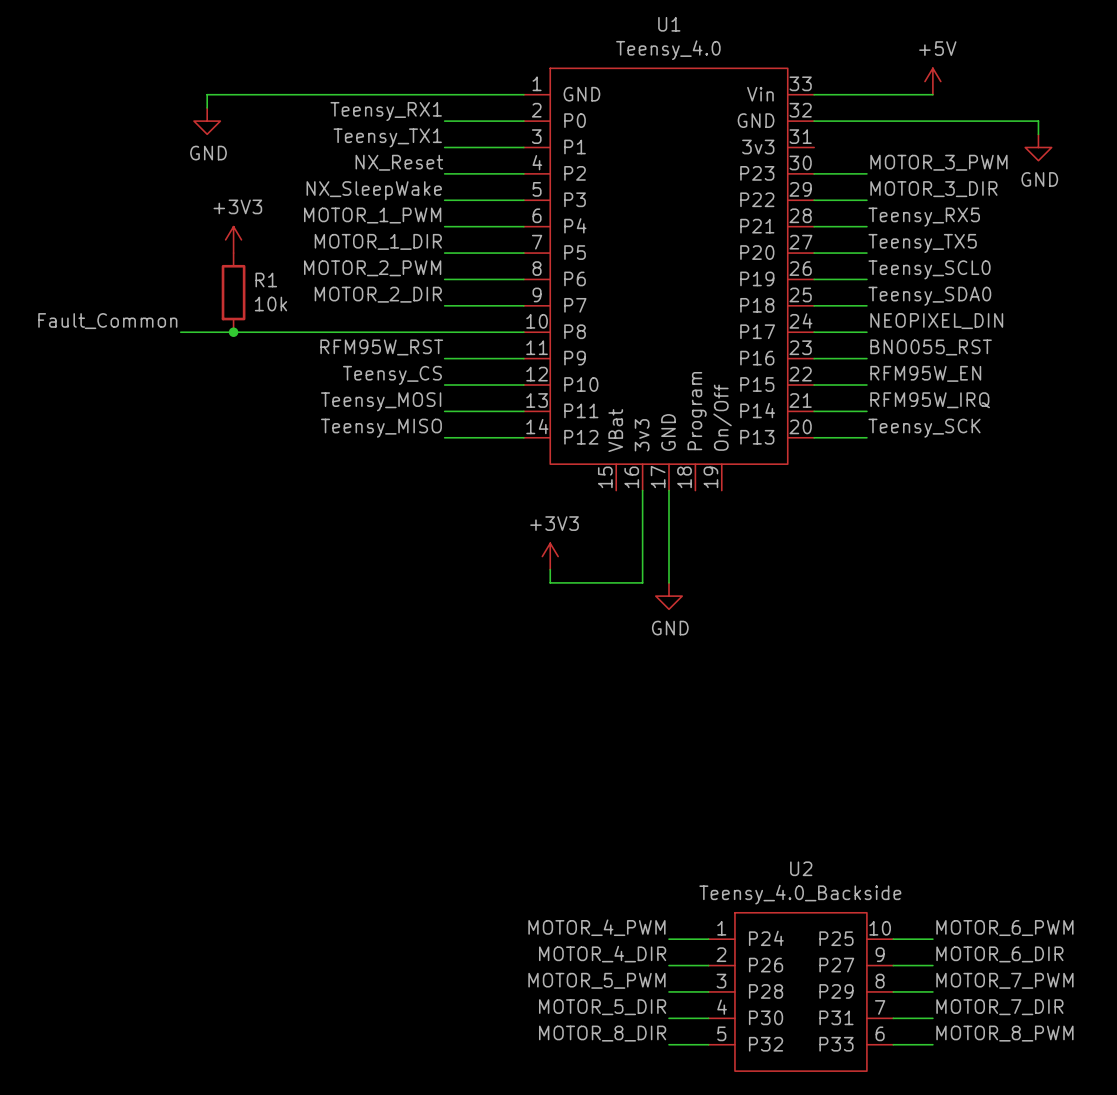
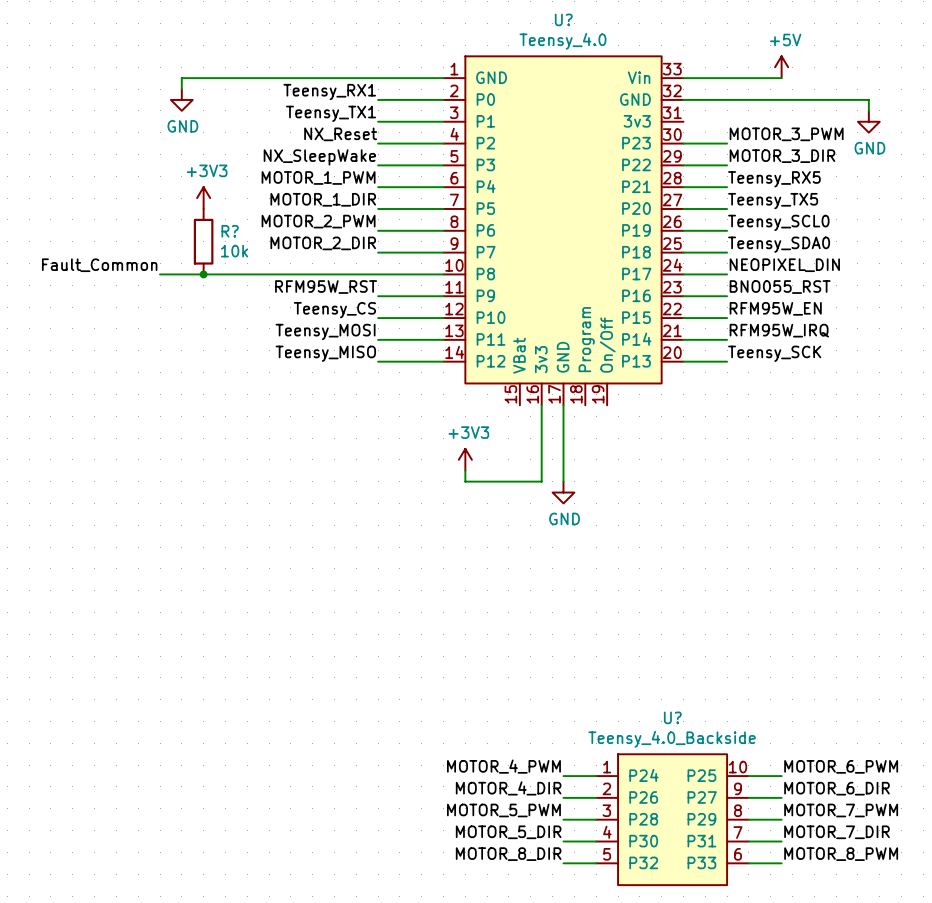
U1 name: U1 (669, 24) -> U? (563, 19)
R1 name: R1 (266, 280) -> R? (230, 231)
U2 name: U2 (801, 868) -> U? (672, 717)

